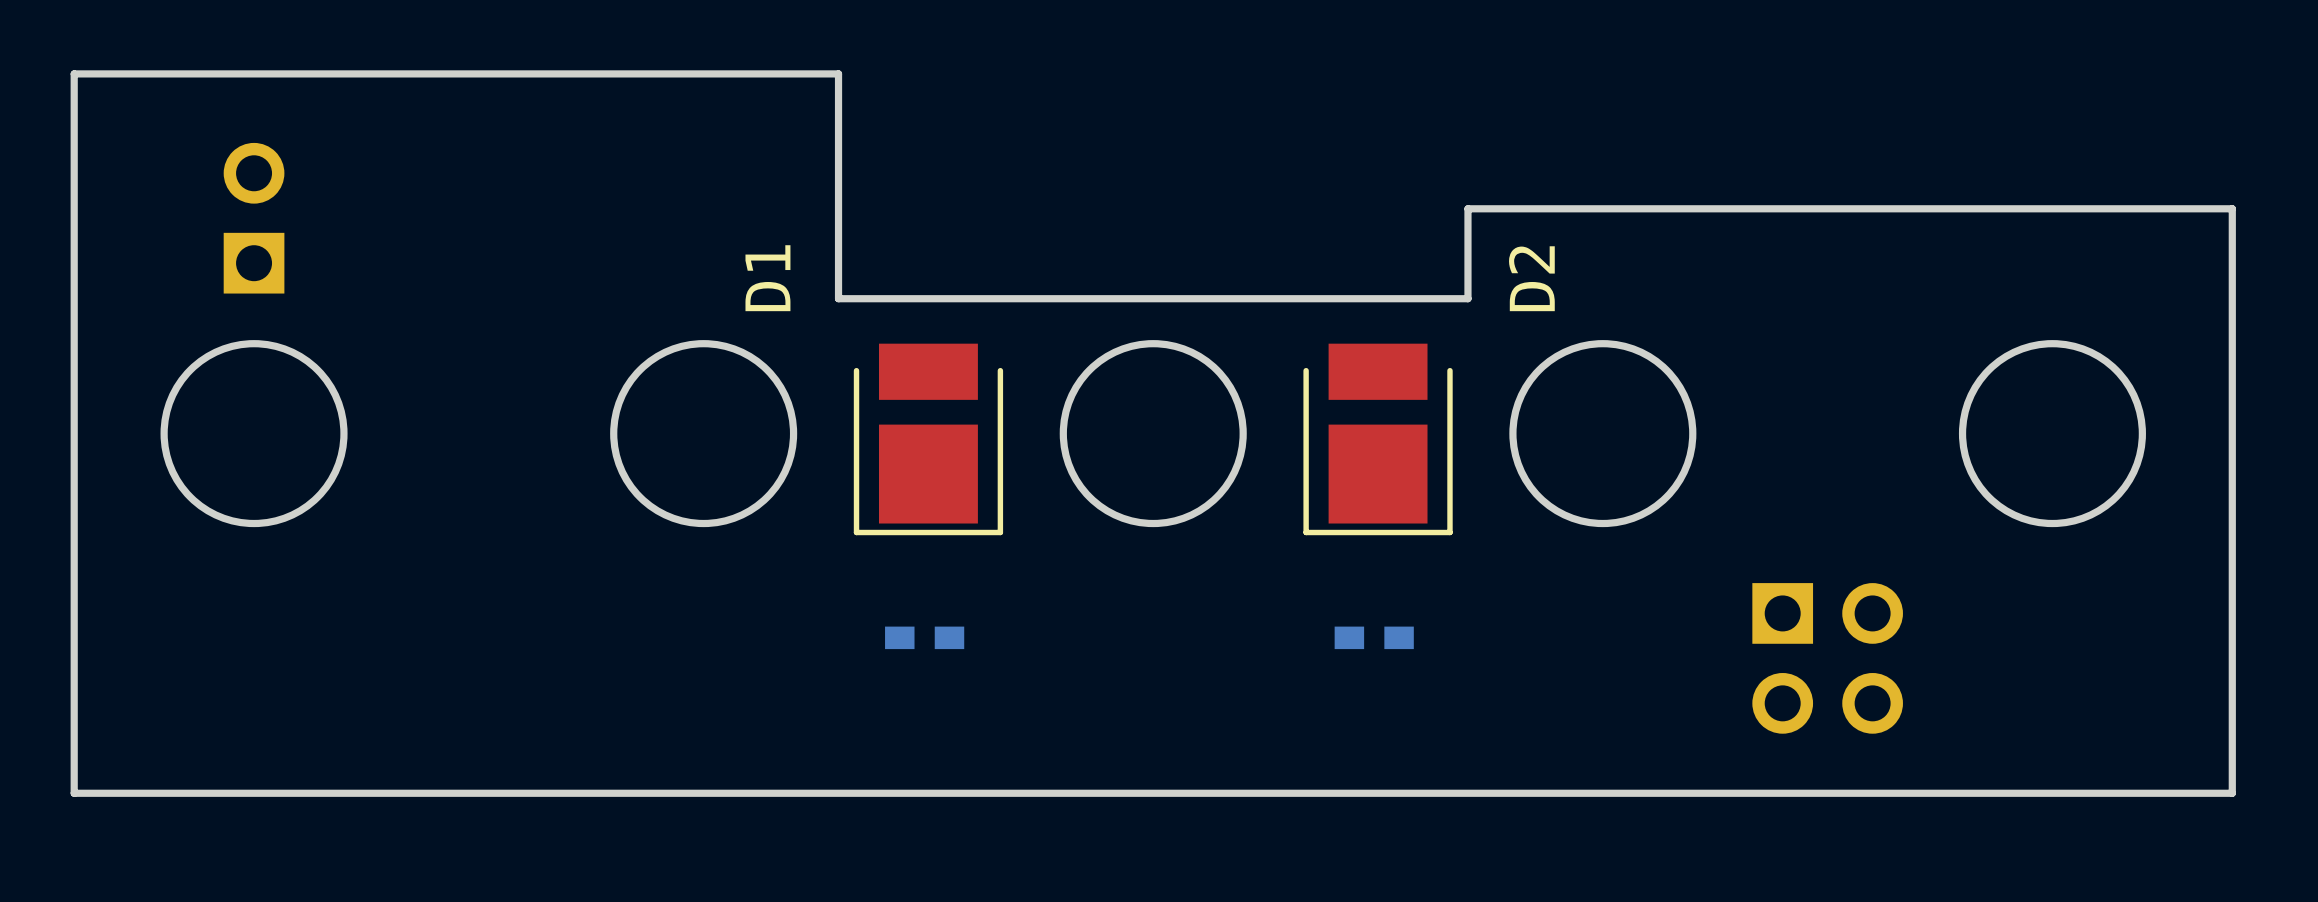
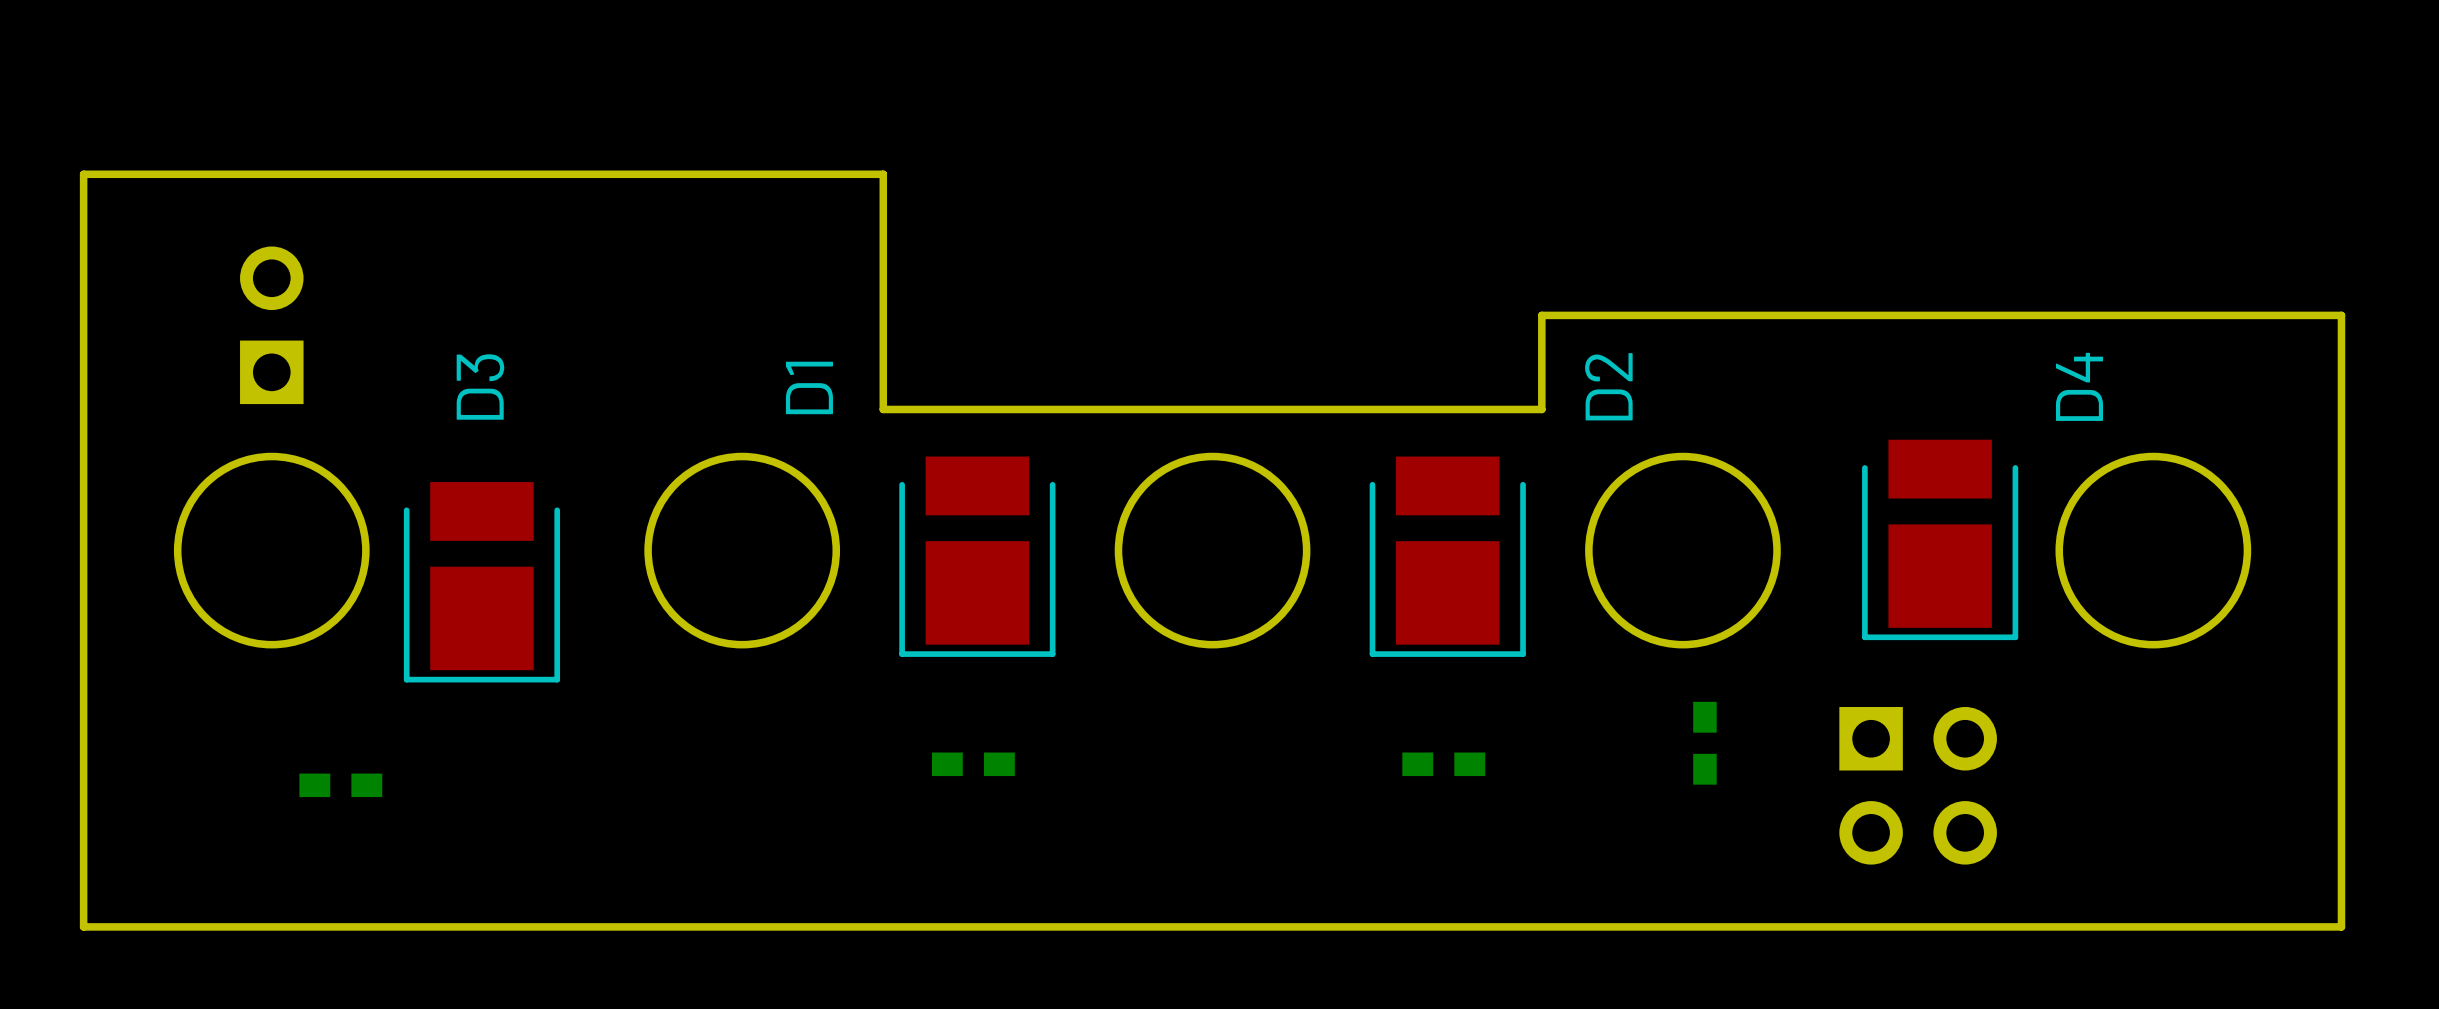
D4: none -> (1940, 539)
D3: none -> (481, 582)
part: none -> (1704, 743)
part: none -> (340, 785)

